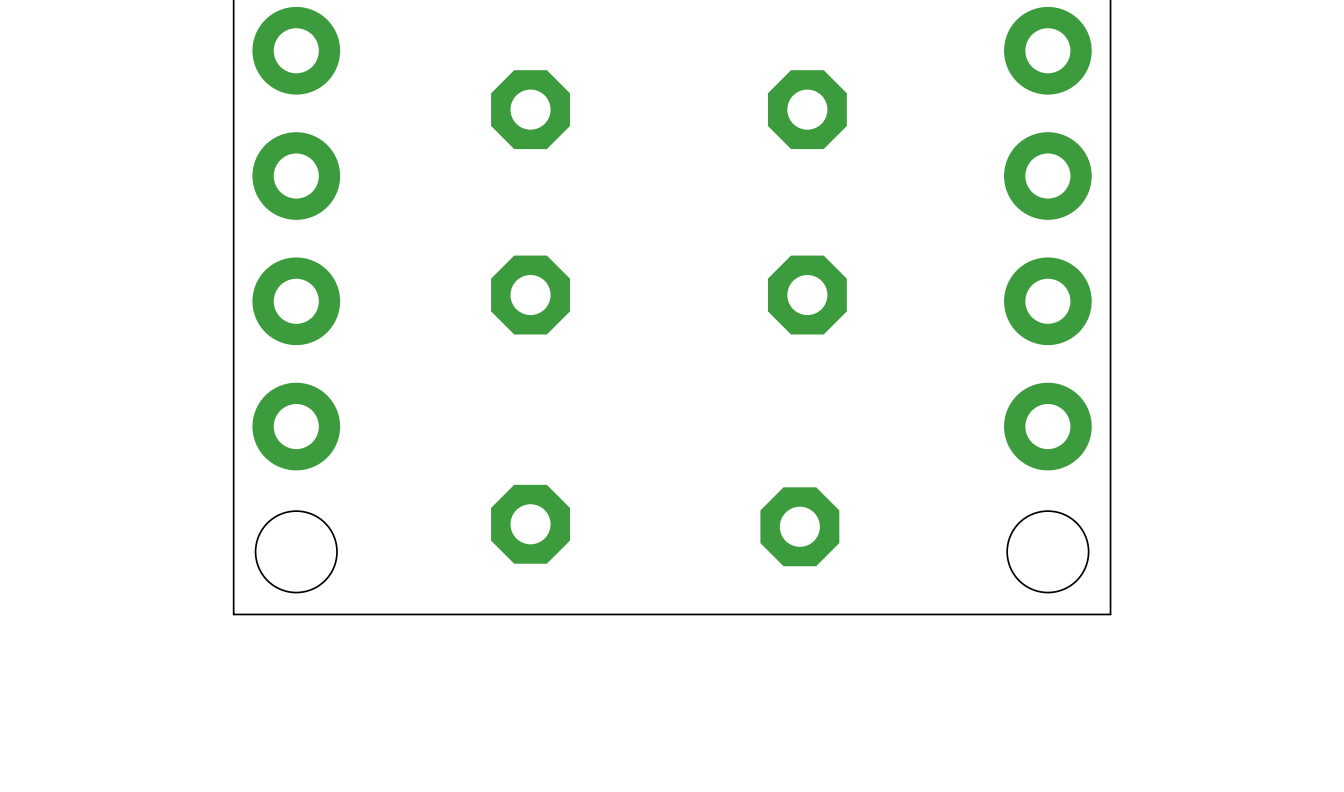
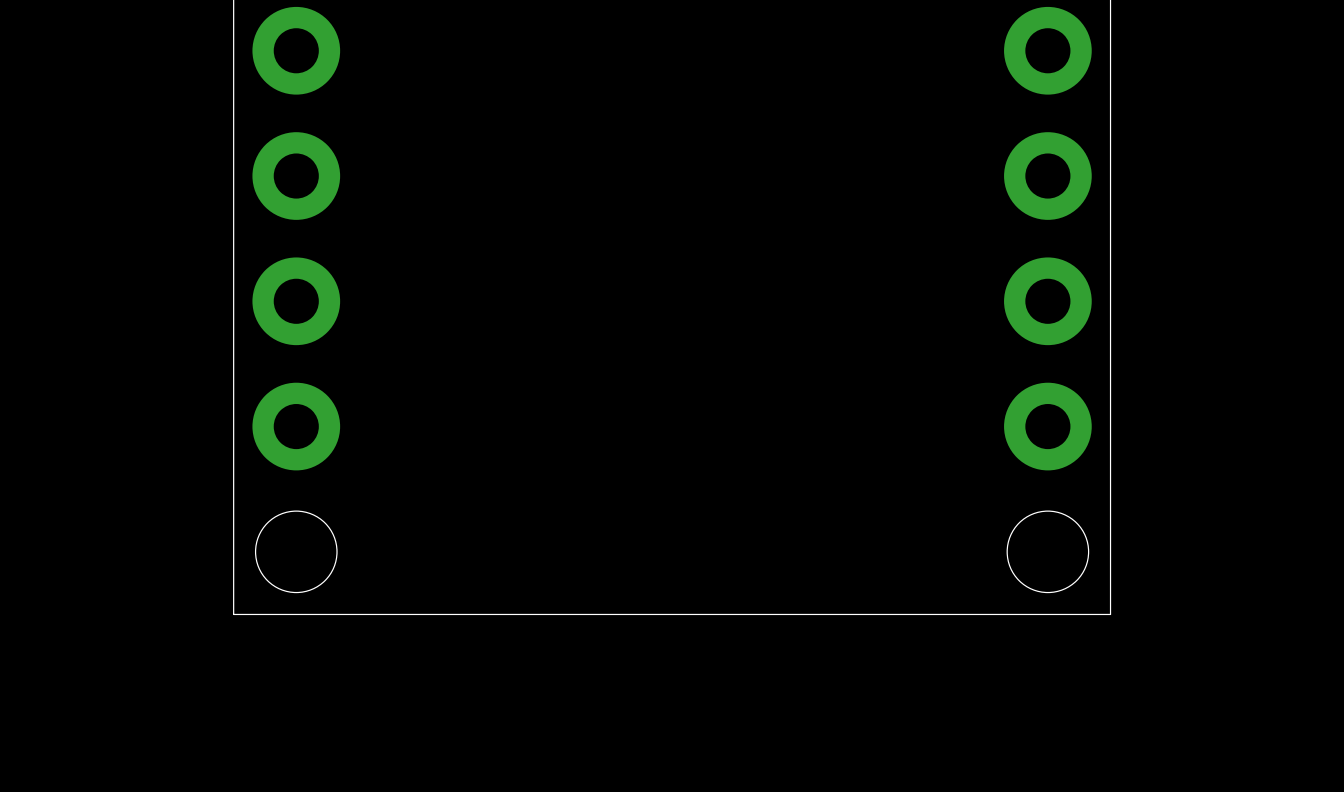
part: (530, 109) -> none
part: (807, 109) -> none
part: (530, 295) -> none
part: (807, 295) -> none
part: (530, 524) -> none
part: (799, 526) -> none

